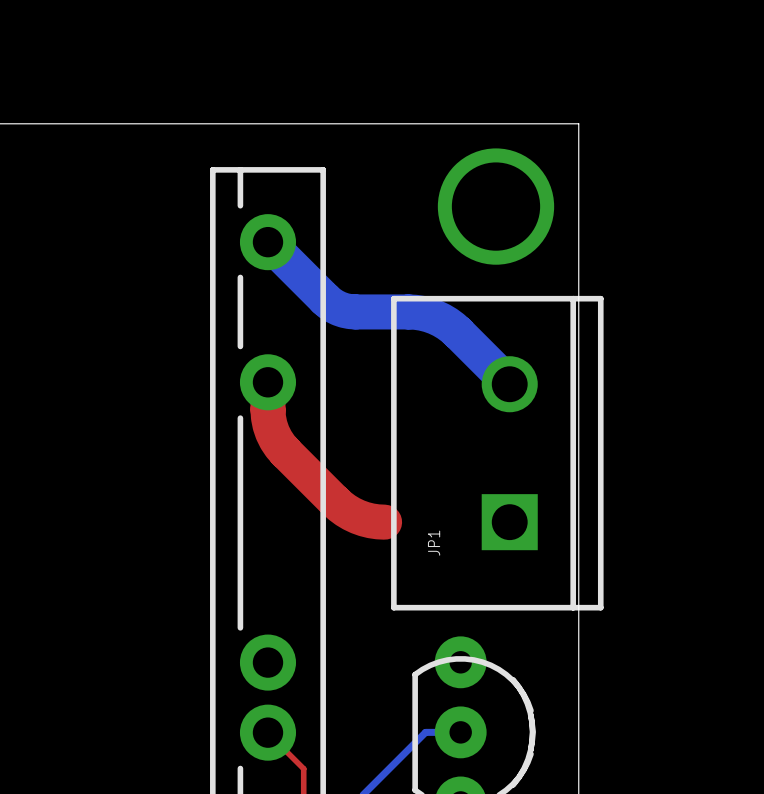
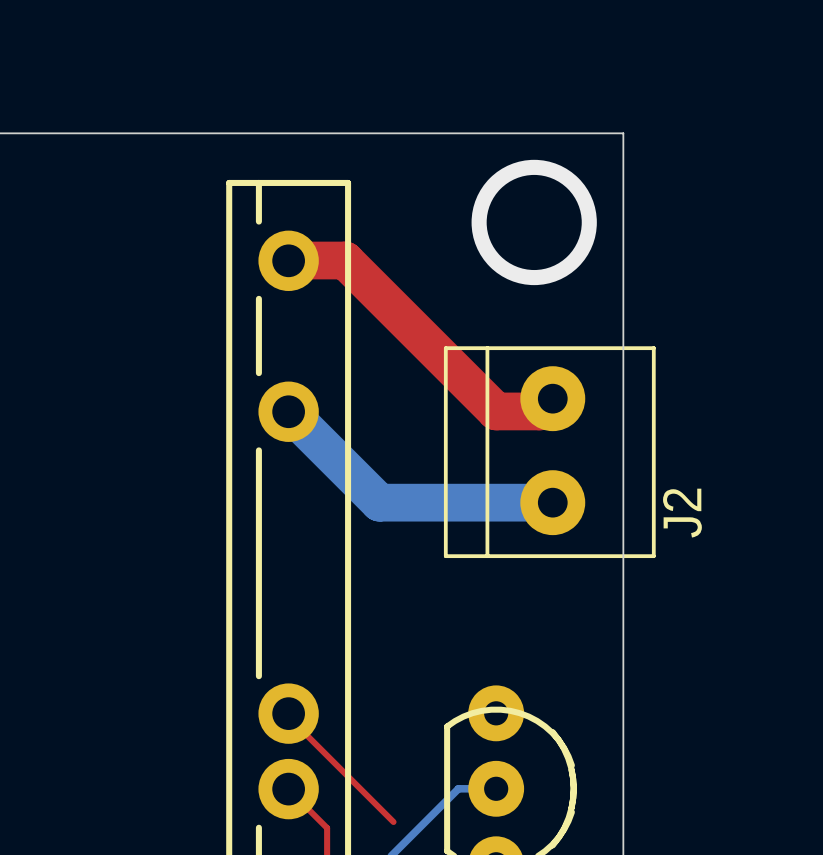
top track: none -> (288, 260) (345, 260) (496, 411) (540, 411) (552, 398)
bottom track: (267, 242) (334, 306) (349, 311) (415, 312) (435, 317) (452, 327) (509, 384) -> none
top track: (267, 382) (268, 417) (272, 432) (280, 446) (345, 510) (364, 519) (384, 522) -> none
bottom track: none -> (288, 411) (379, 502) (552, 502)
J2: none -> (549, 452)
JP1: (497, 453) -> none
top track: none -> (290, 719) (393, 822)

